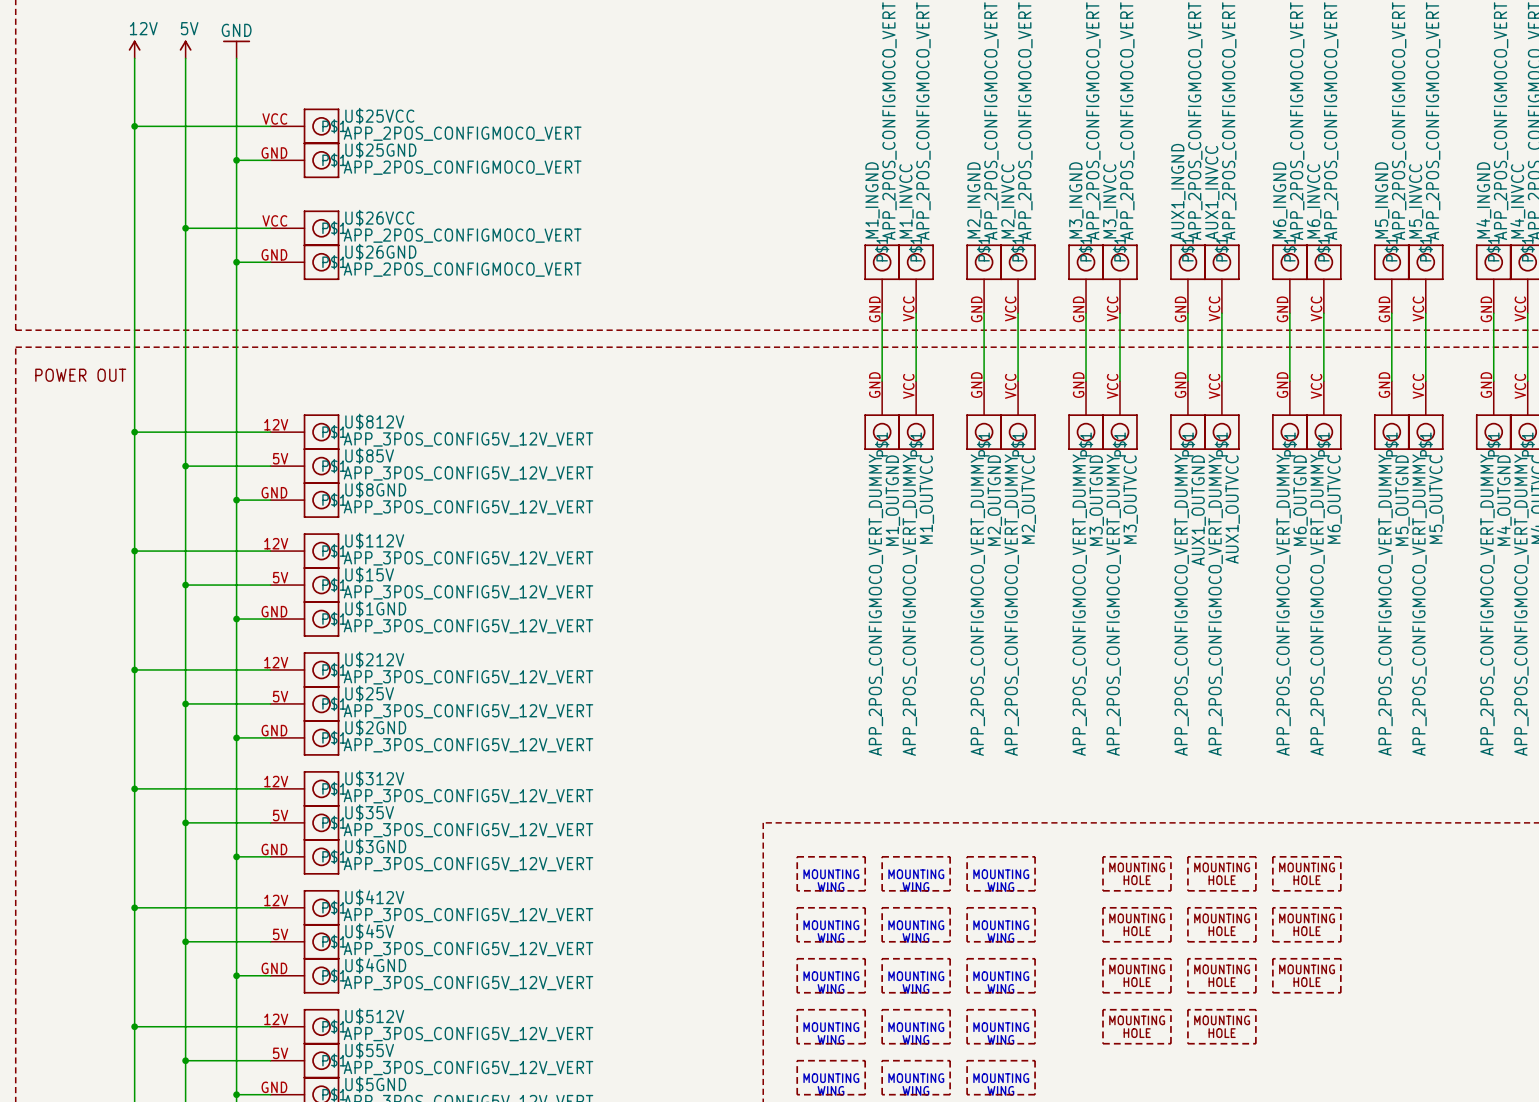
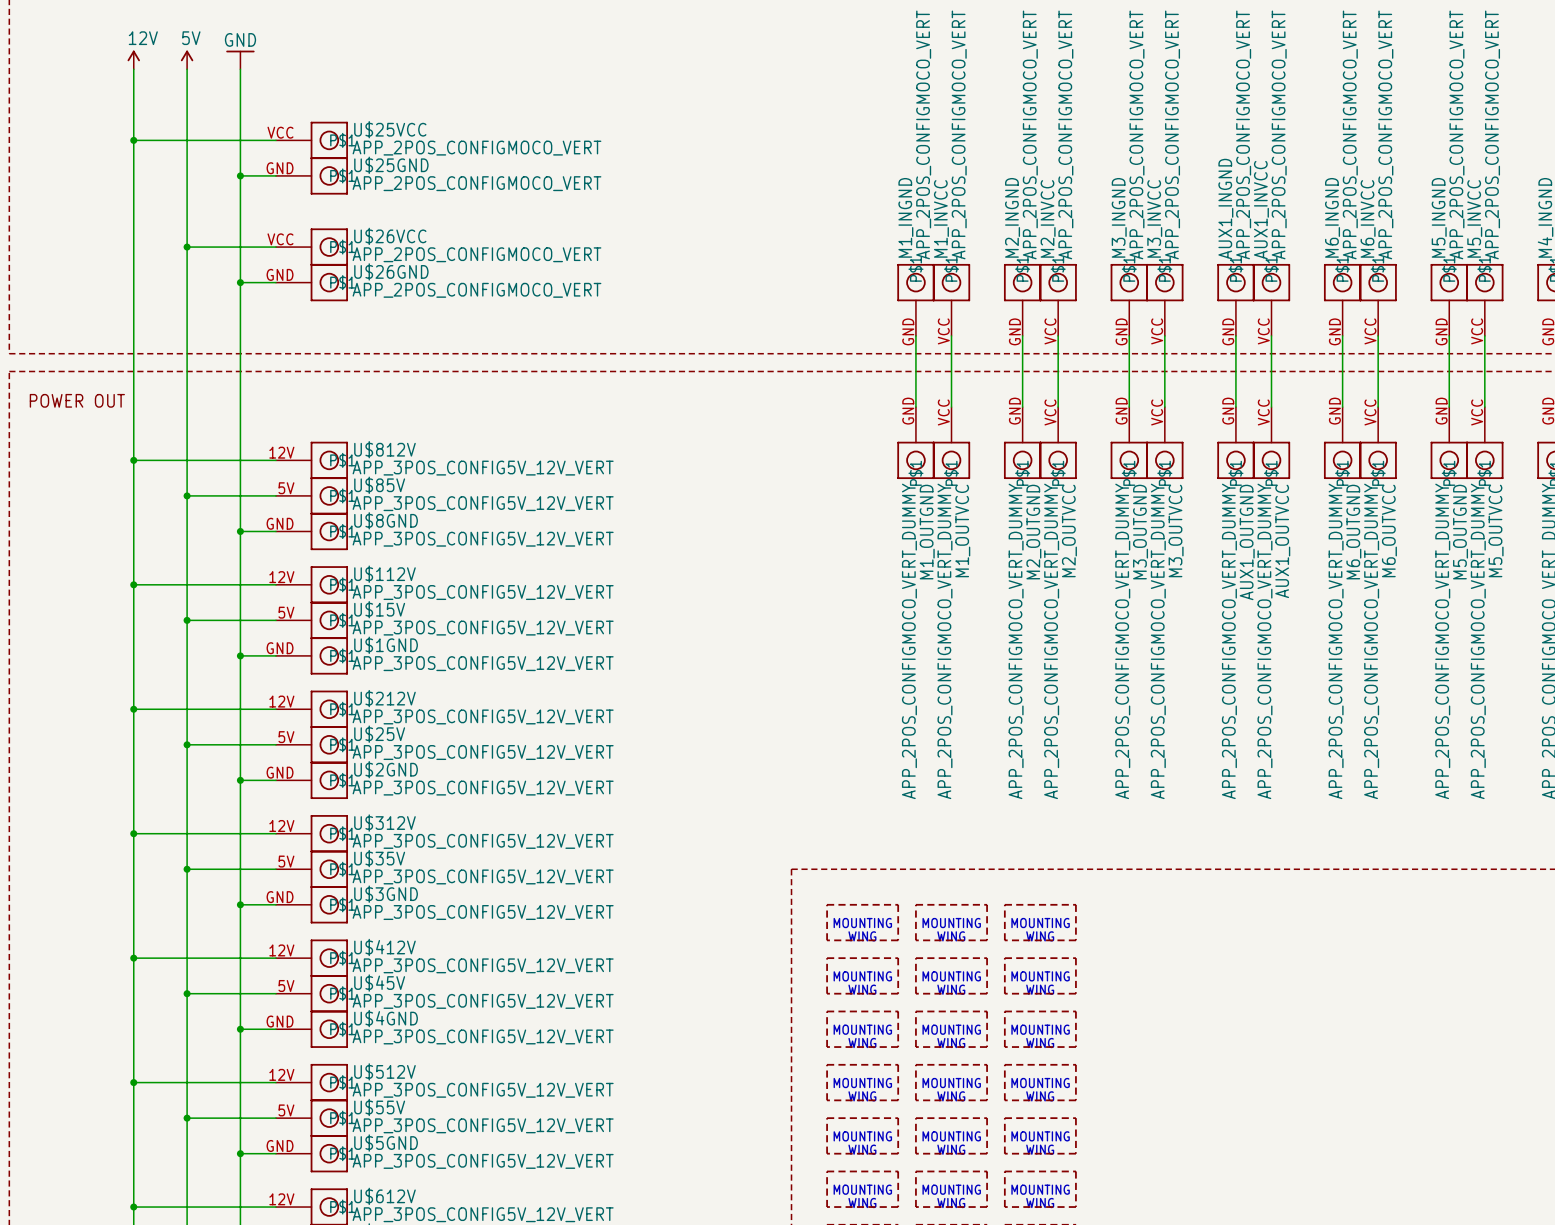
part: (1136, 873) -> none
part: (1221, 873) -> none
part: (1306, 873) -> none
part: (1136, 924) -> none
part: (1221, 924) -> none
part: (1306, 924) -> none
part: (1136, 975) -> none
part: (1221, 975) -> none
part: (1306, 975) -> none
part: (1136, 1026) -> none
part: (1221, 1026) -> none

